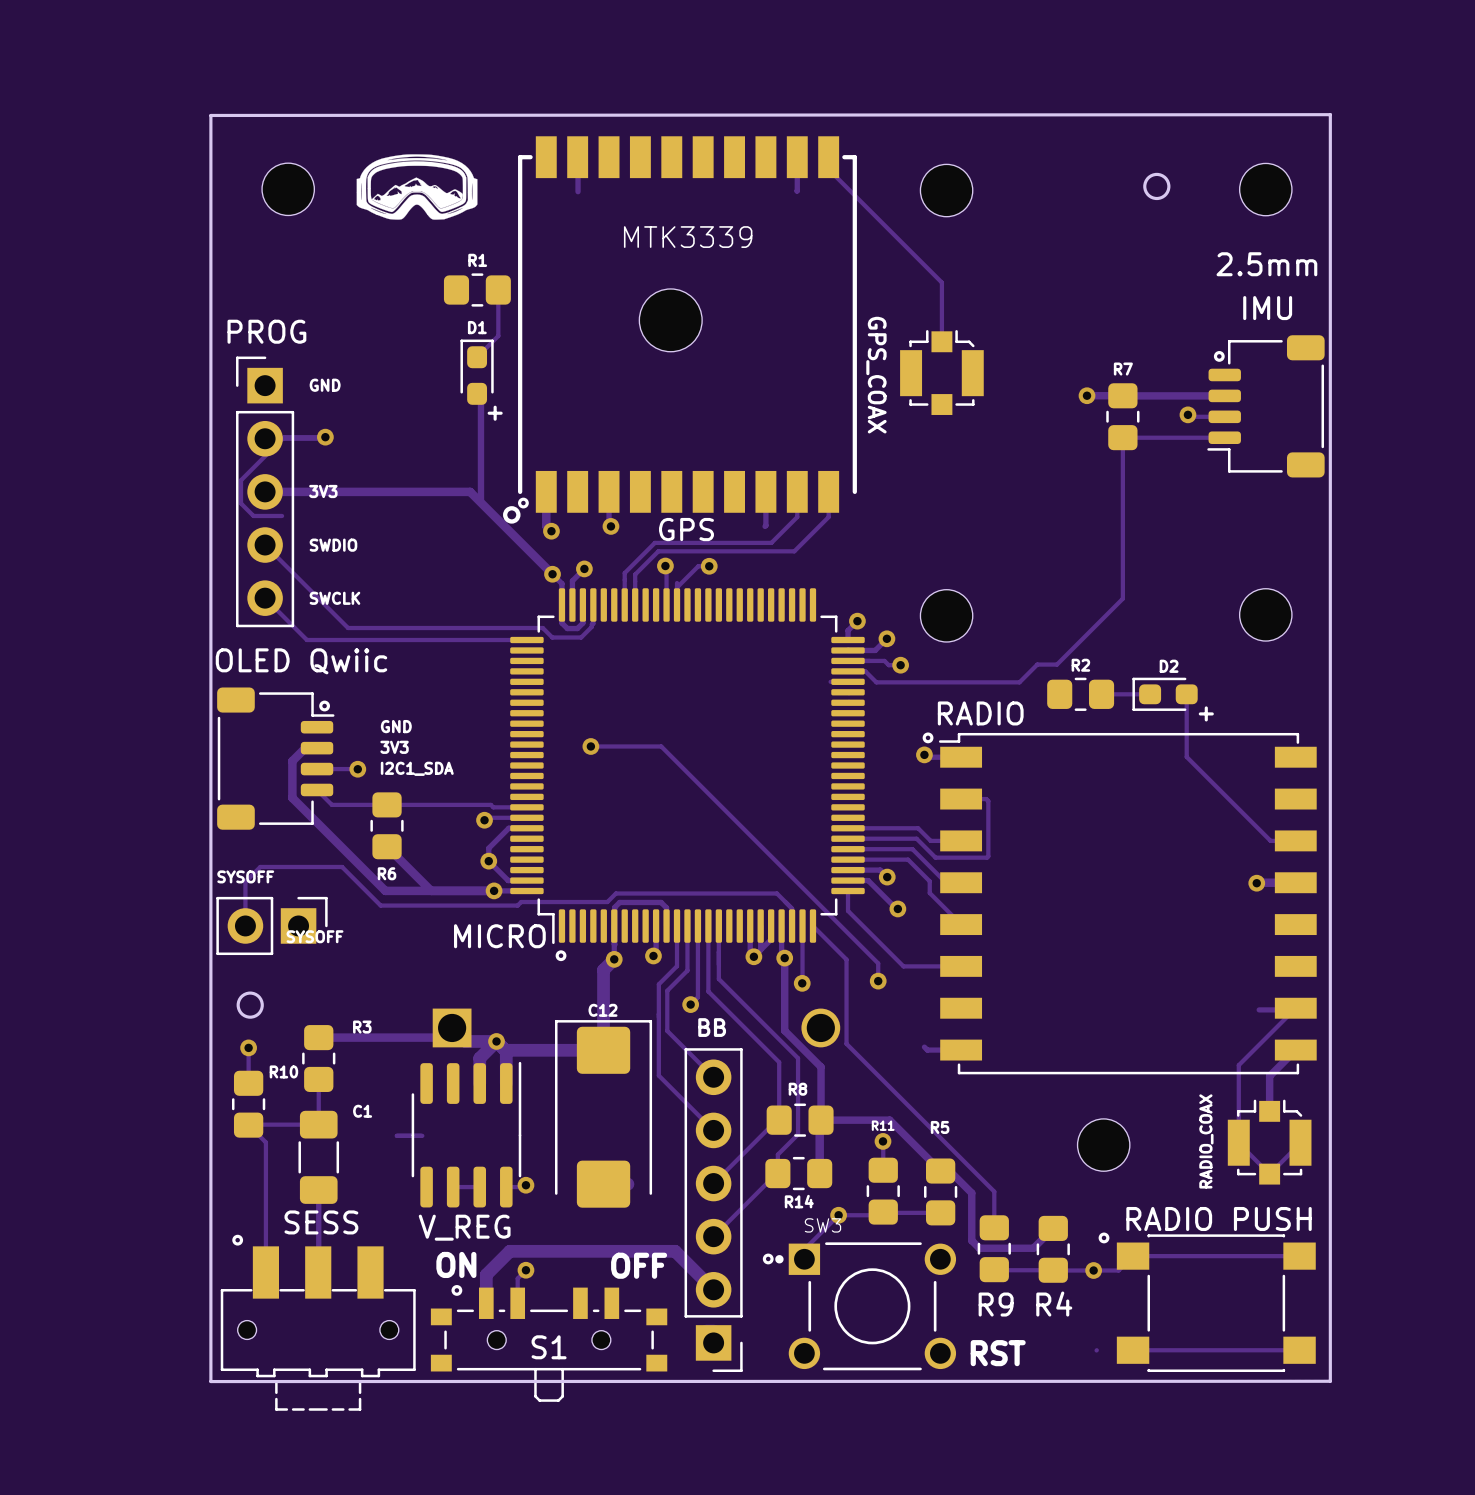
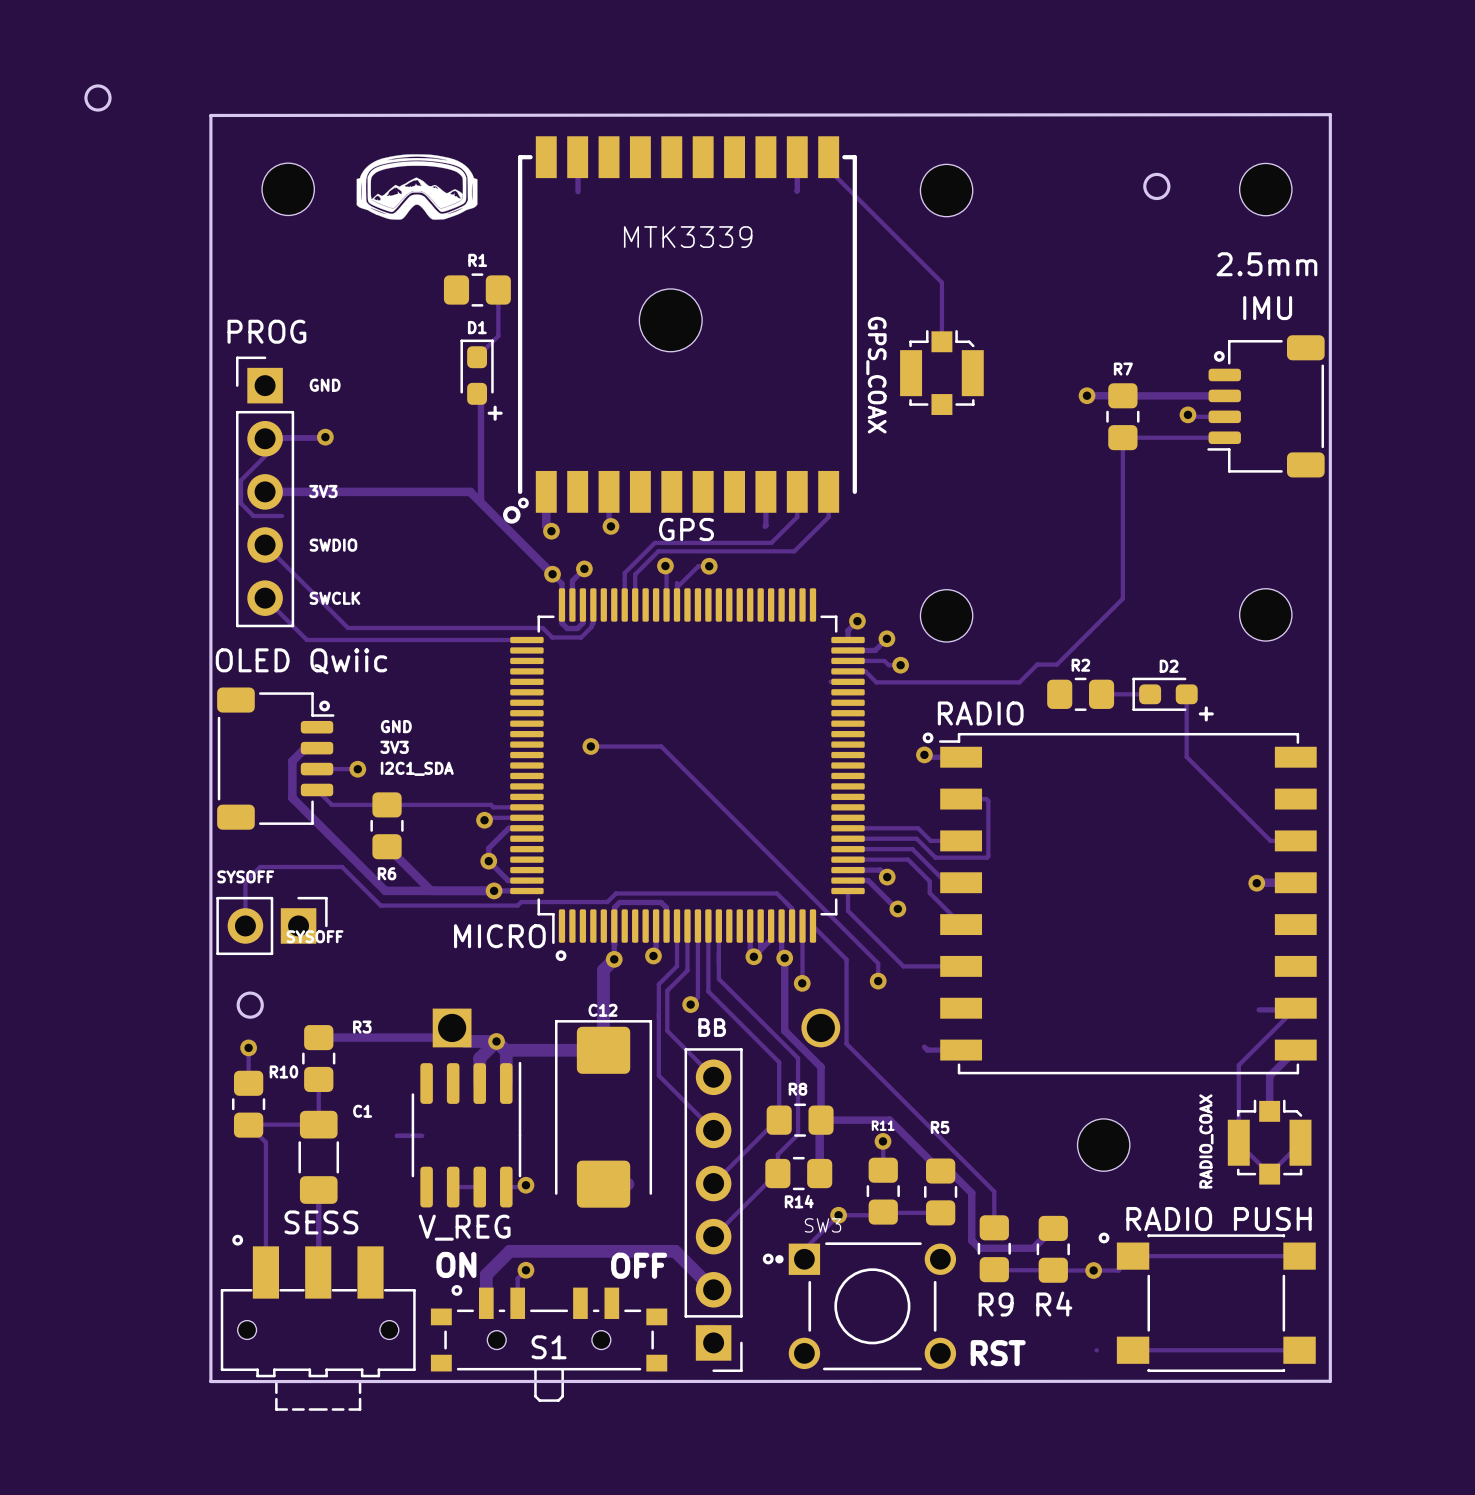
round board edge: none -> [84, 84, 112, 112]

